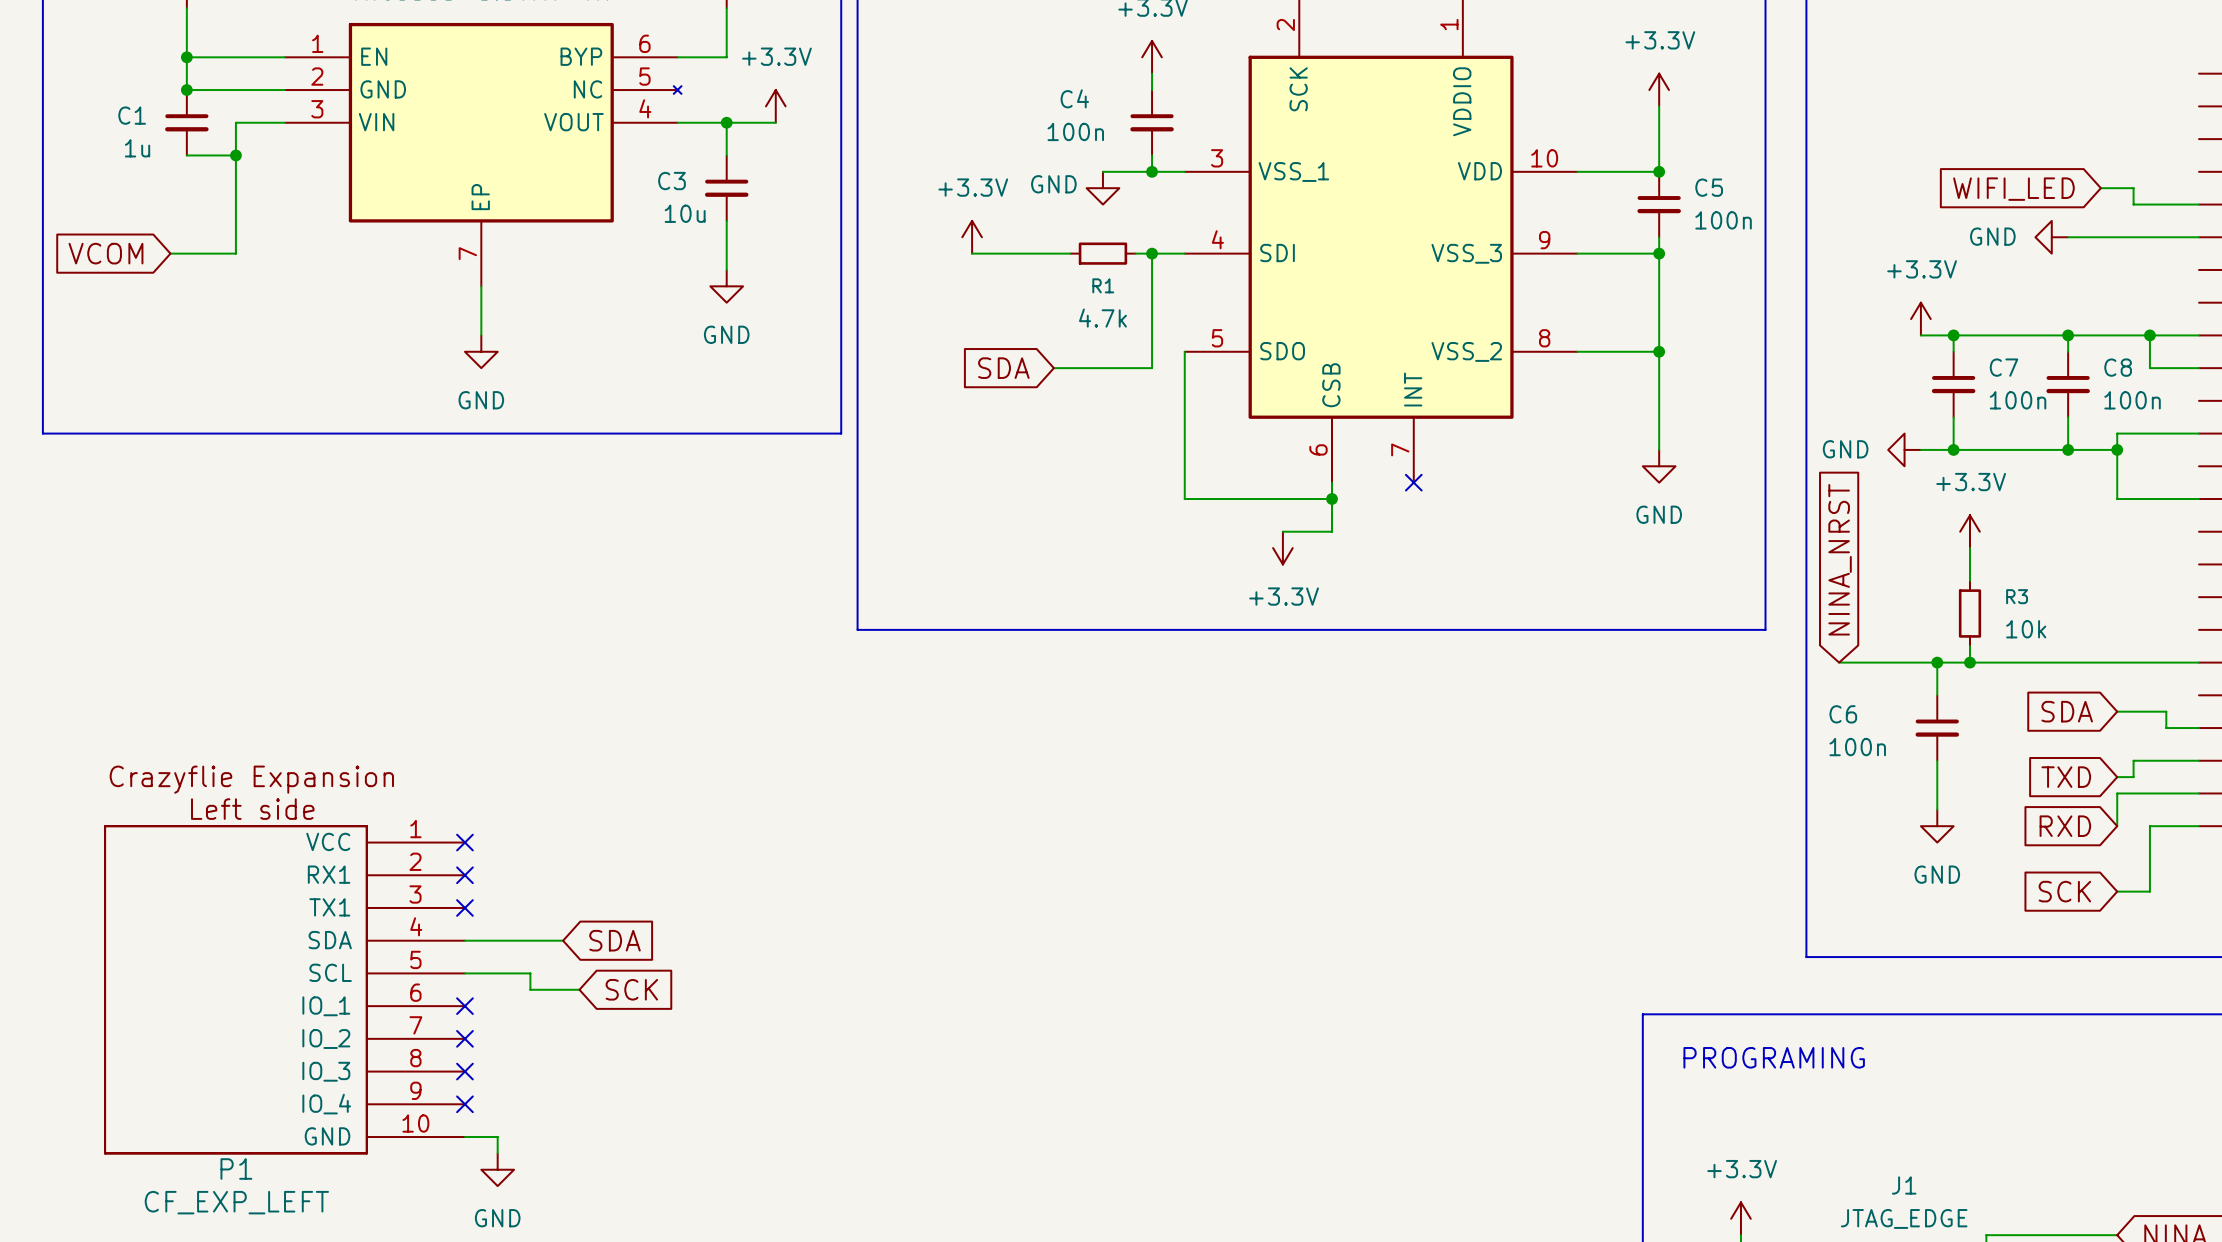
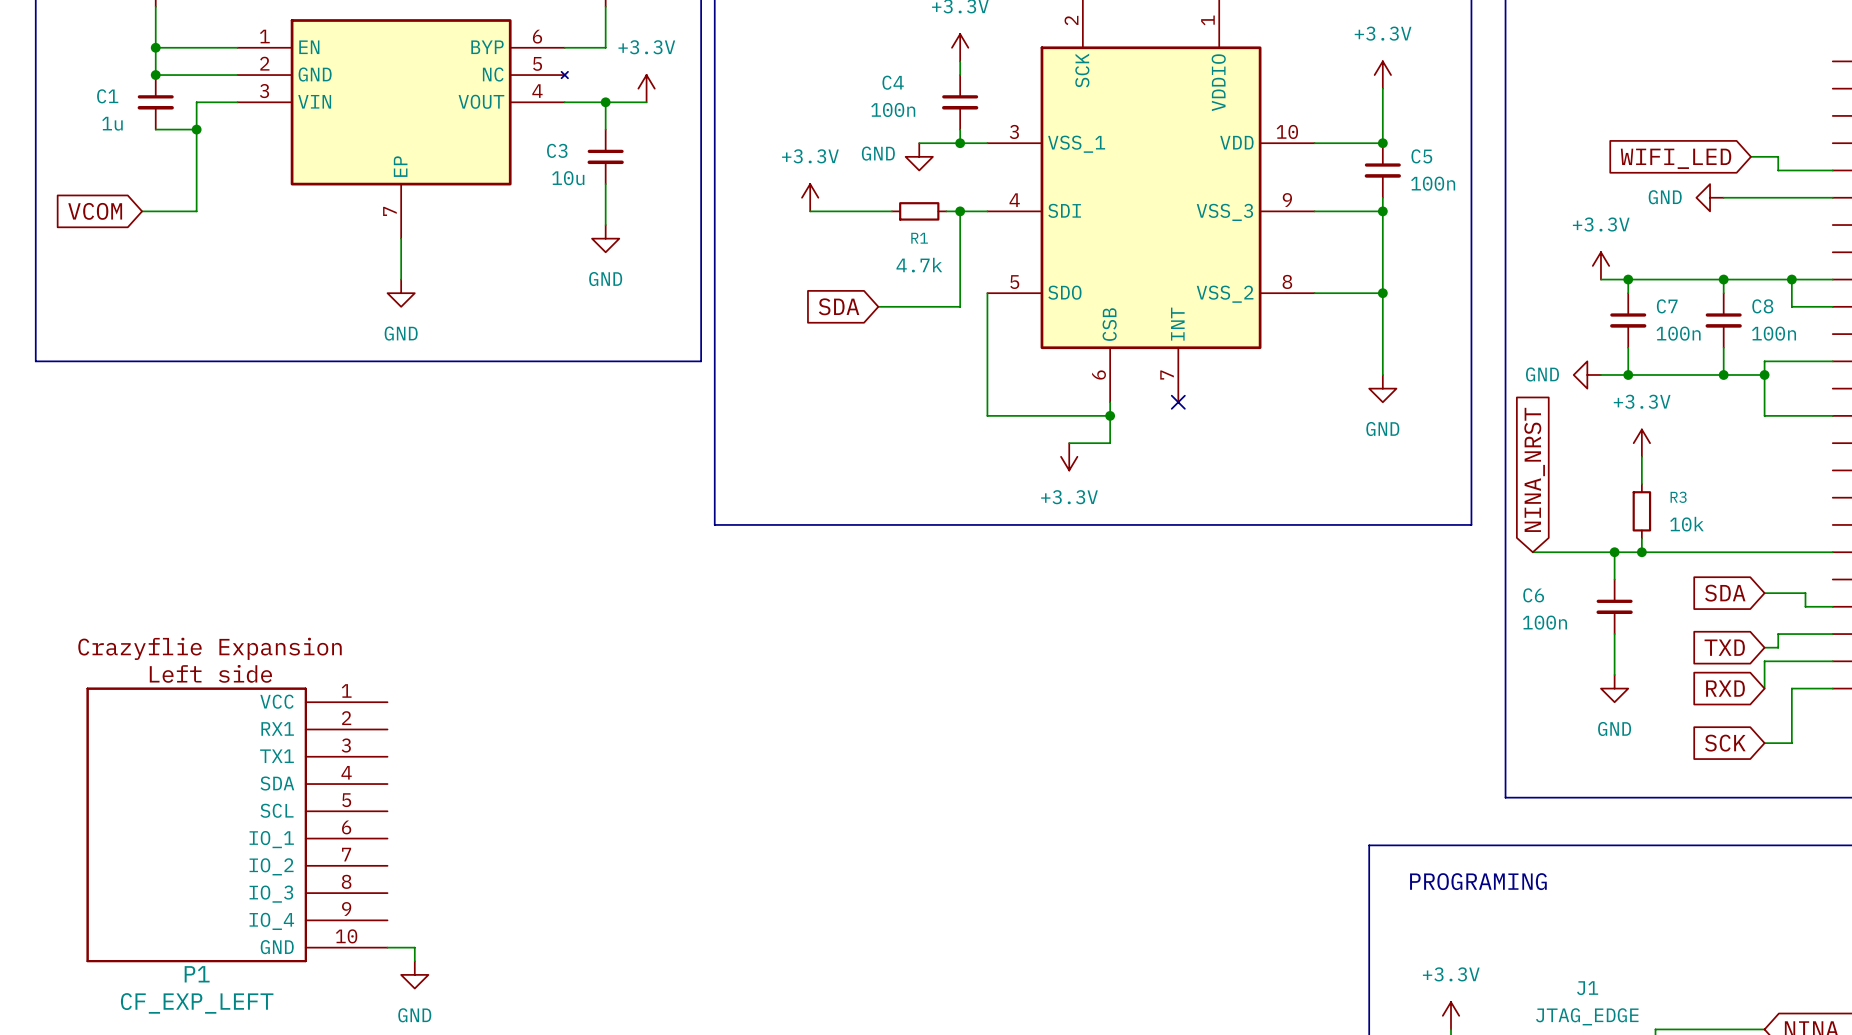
no-connect mark: (464, 842) -> none
no-connect mark: (464, 875) -> none
no-connect mark: (464, 907) -> none
wire: (464, 940) (563, 940) -> none
global label: SDA (615, 940) -> none
wire: (464, 973) (530, 973) (530, 989) (579, 989) -> none
global label: SCK (631, 989) -> none
no-connect mark: (464, 1006) -> none
no-connect mark: (464, 1038) -> none
no-connect mark: (464, 1071) -> none
no-connect mark: (464, 1104) -> none

